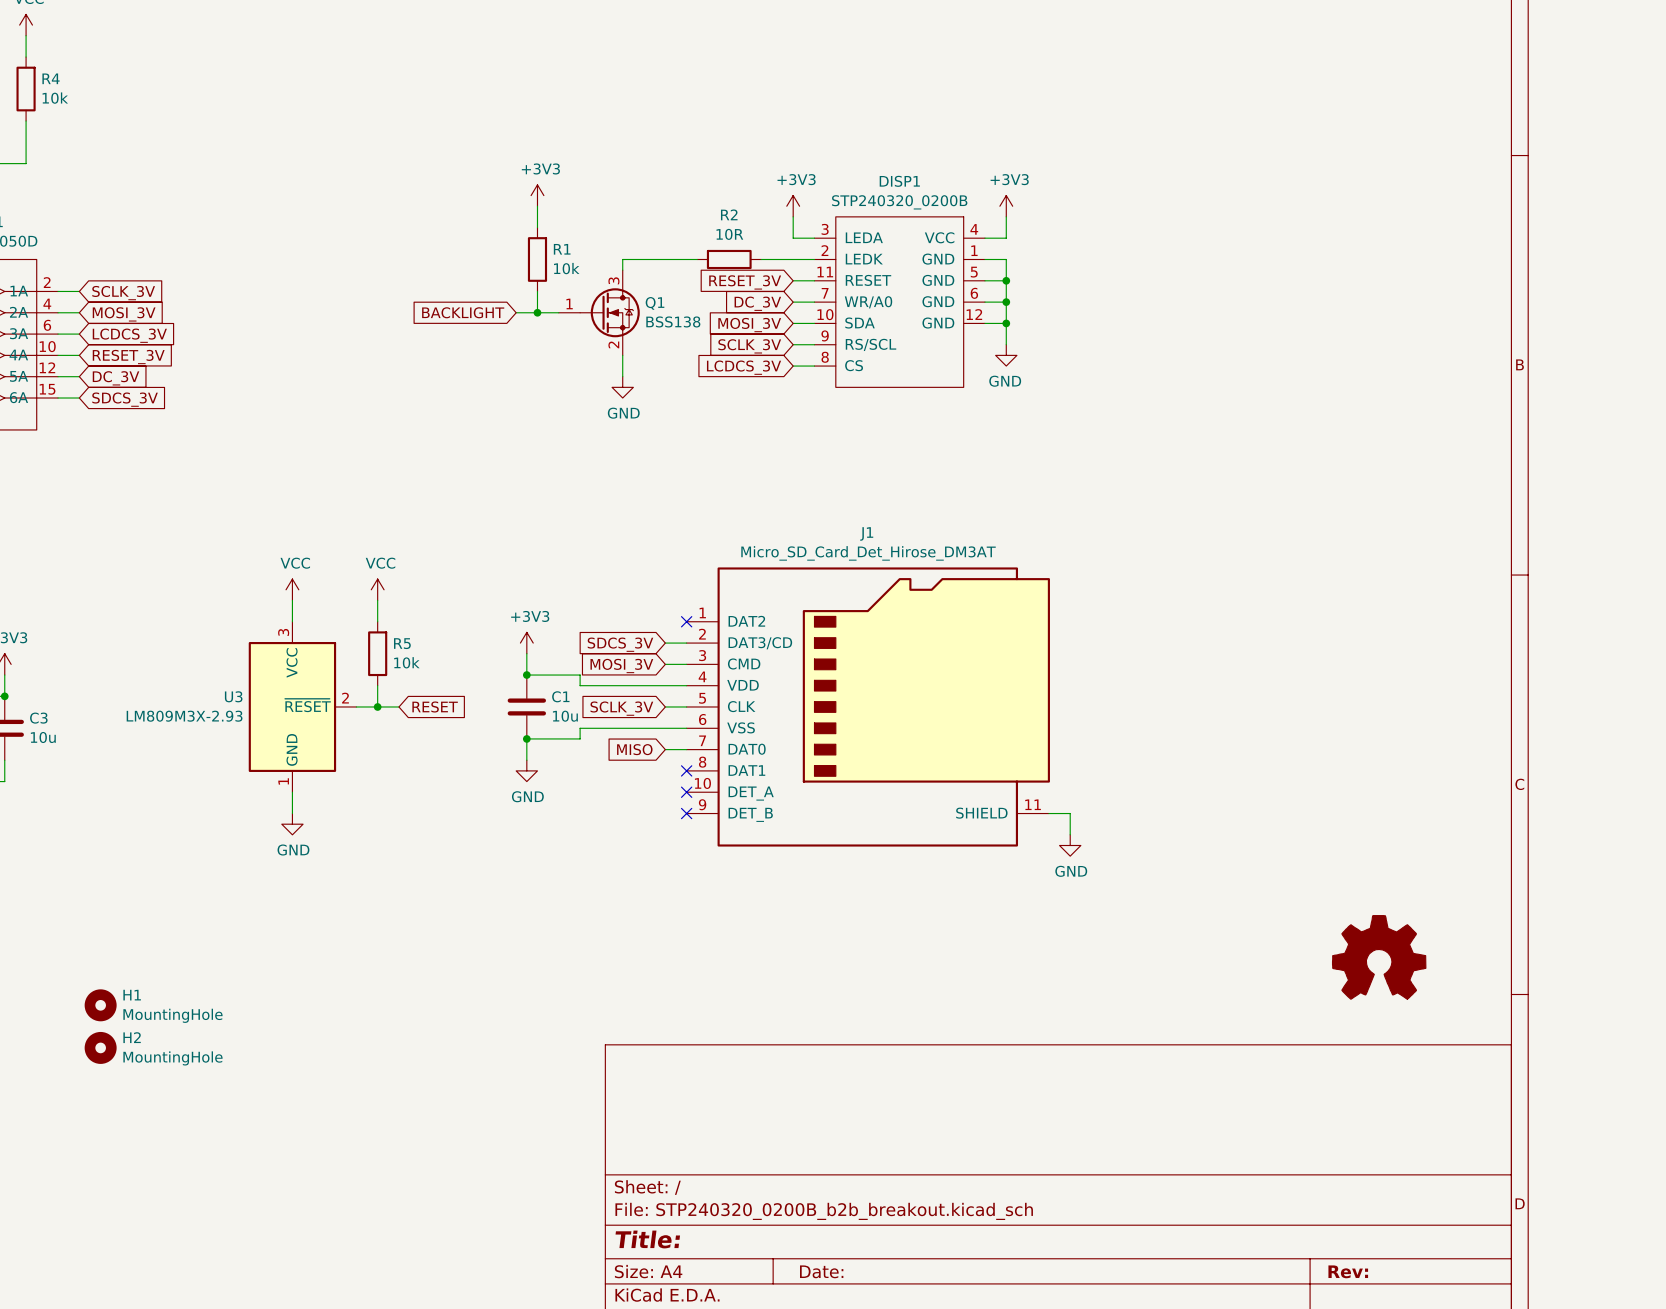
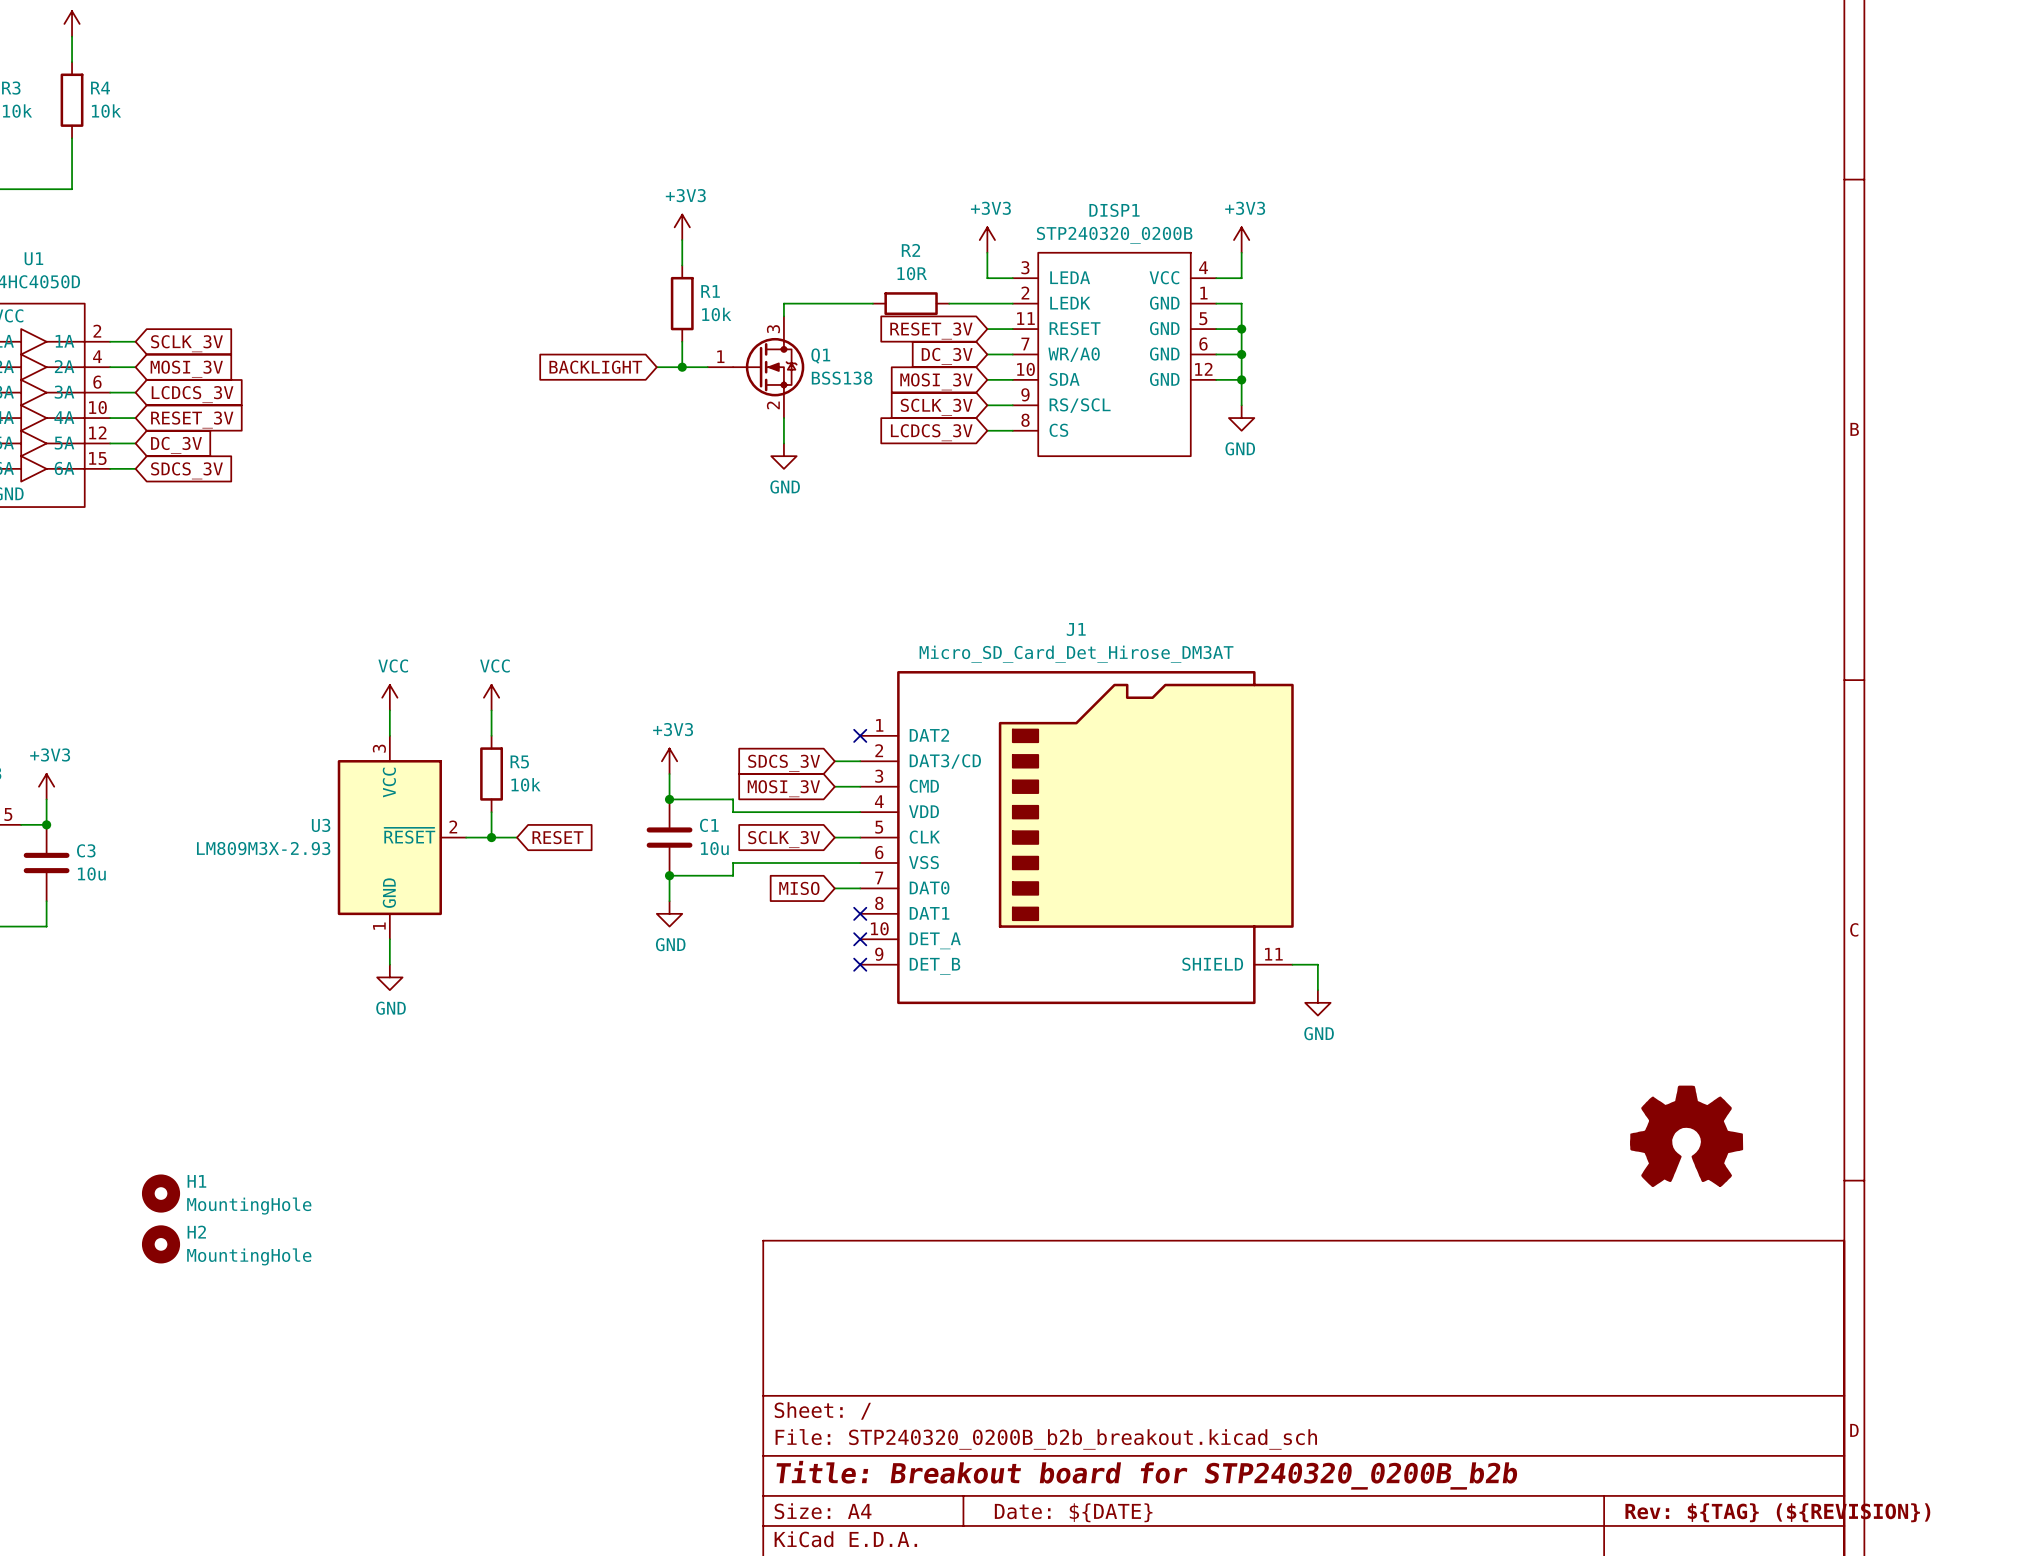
title block: Title: (647, 1239) -> Title: Breakout board for STP240320_0200B_b2b (1146, 1475)
title block: Date: (821, 1271) -> Date: ${DATE} (1073, 1512)
title block: Rev: (1348, 1271) -> Rev: ${TAG} (${REVISION}) (1777, 1512)

